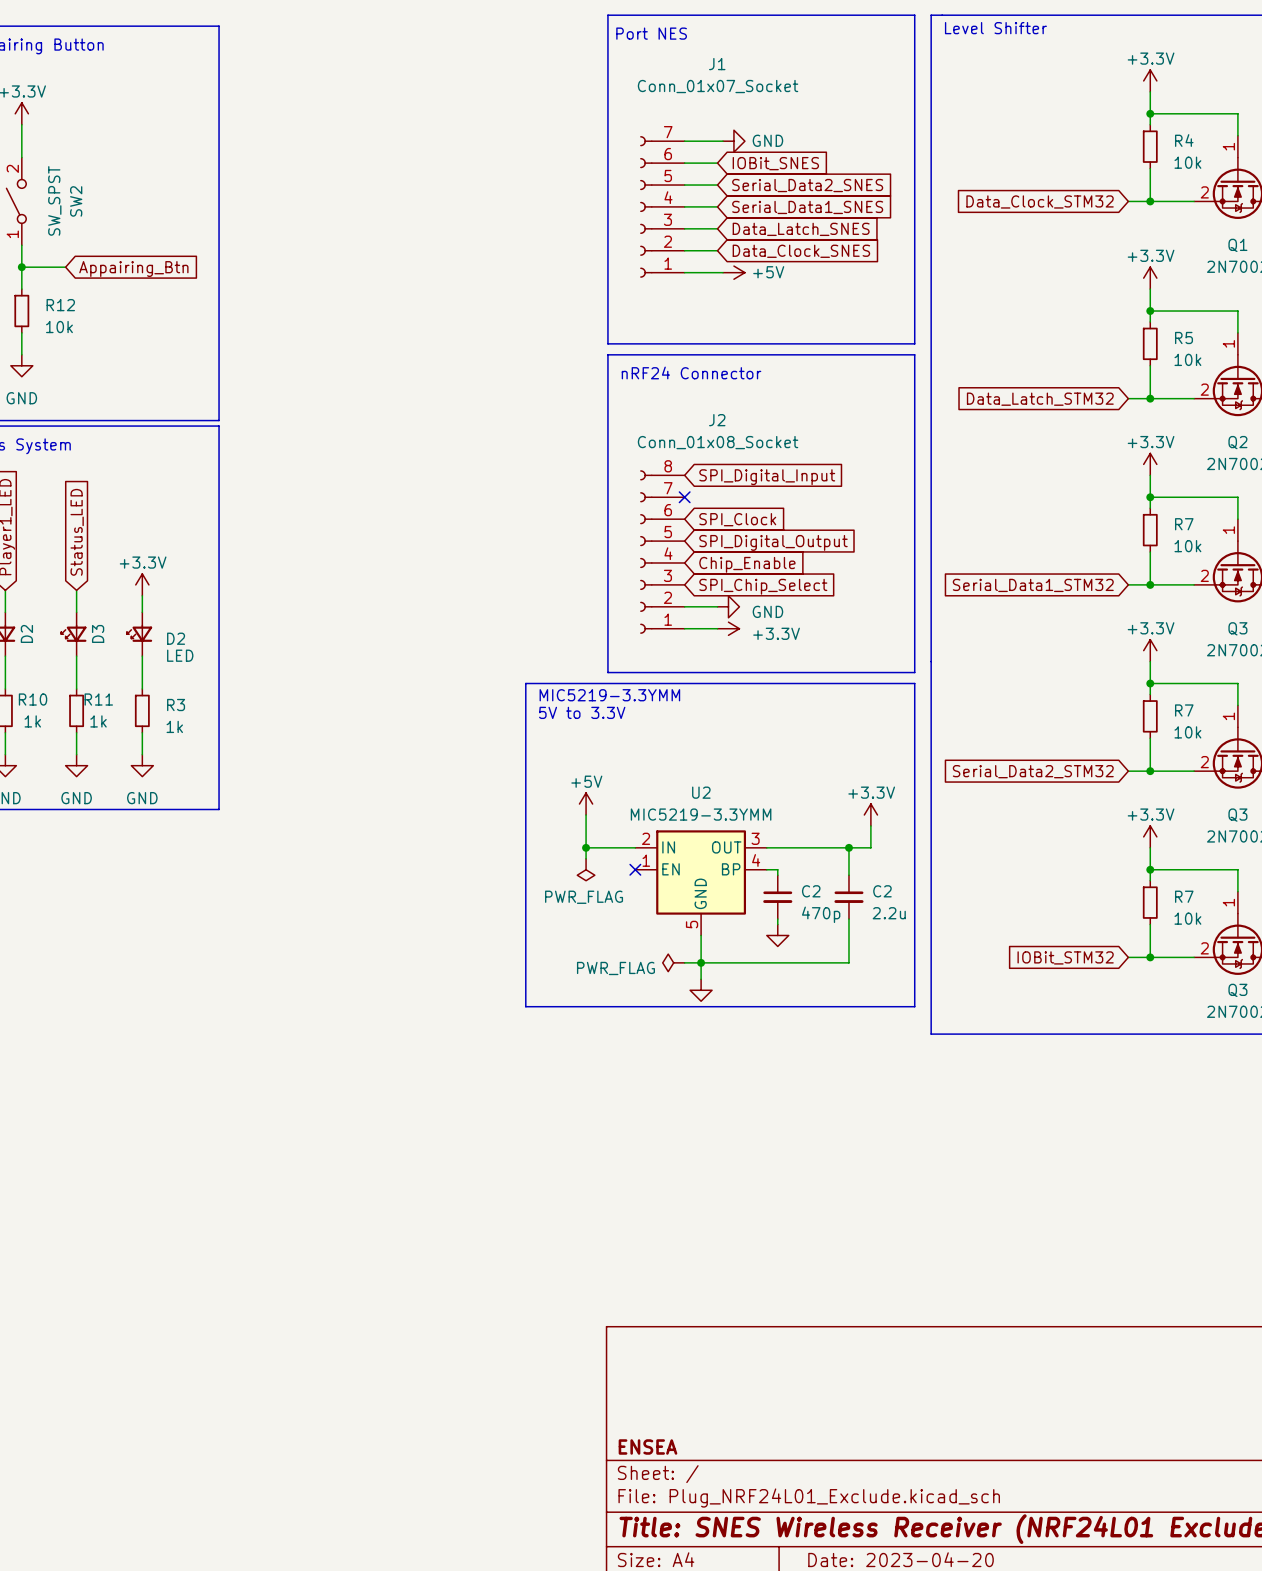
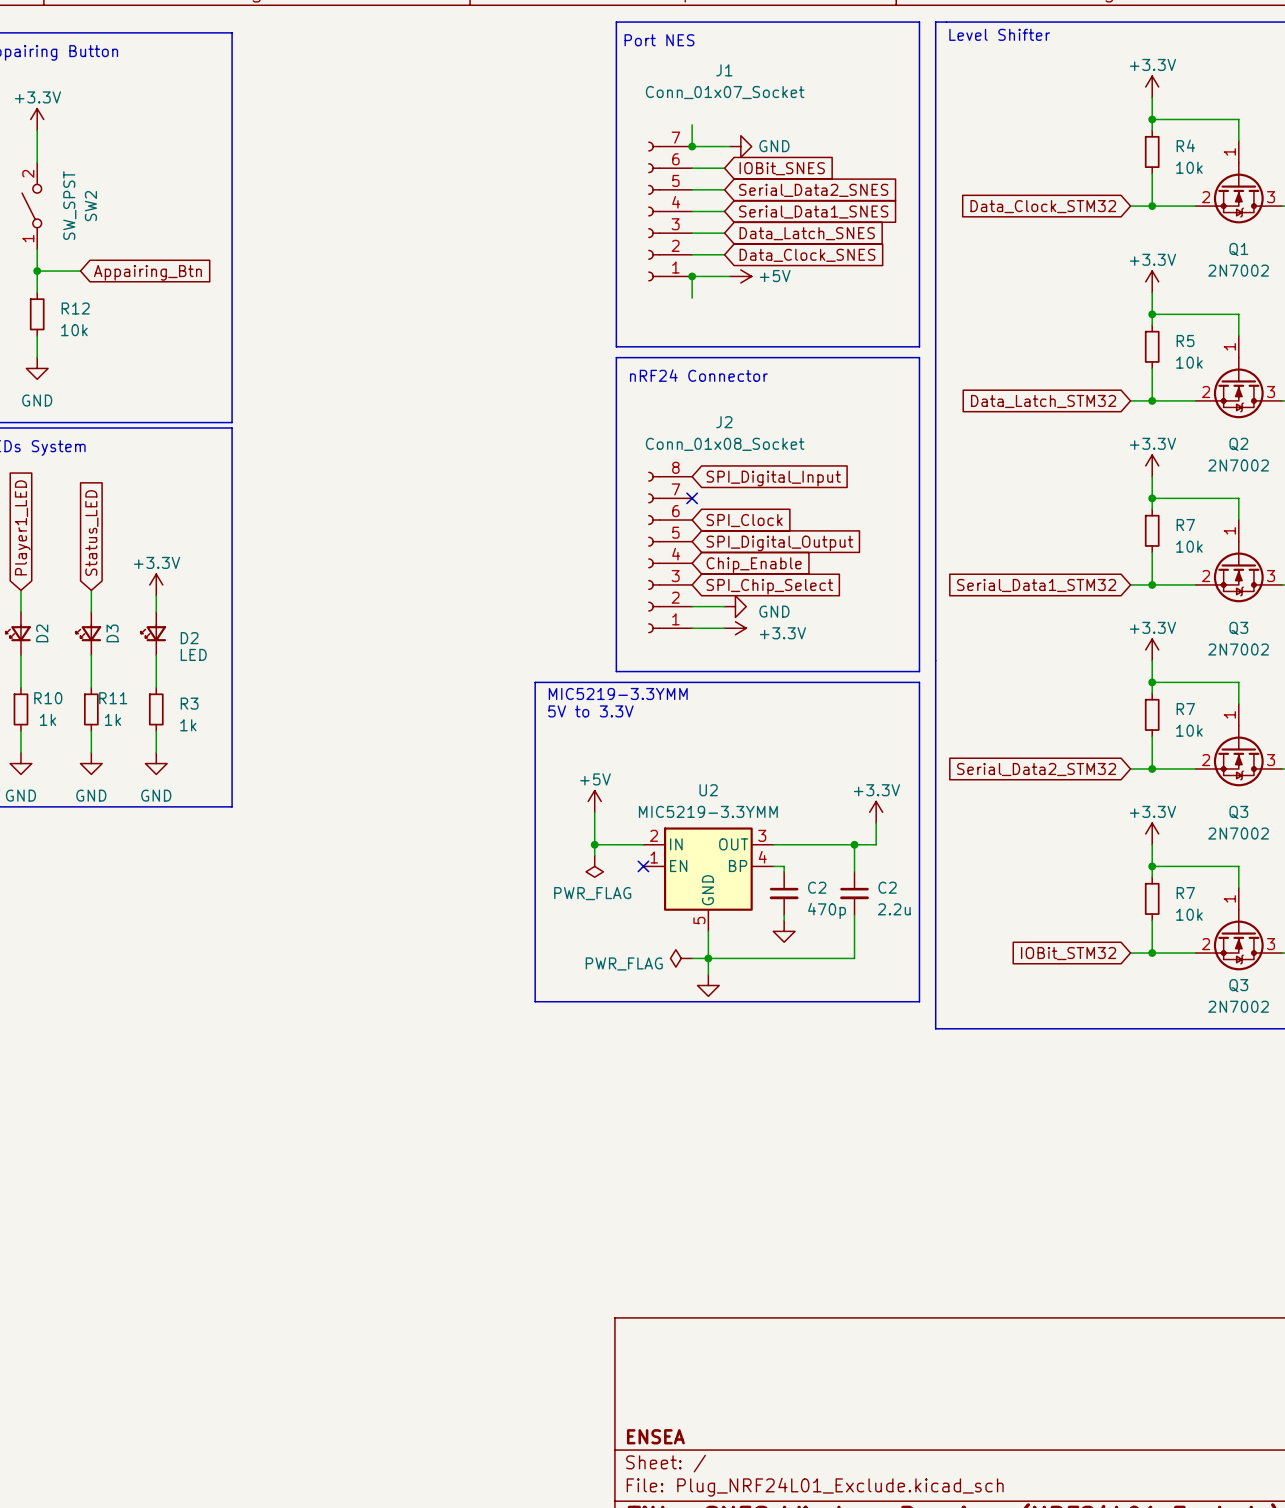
wire: none -> (692, 124) (692, 146)
junction: none -> (692, 146)
wire: none -> (692, 276) (692, 298)
junction: none -> (692, 276)

